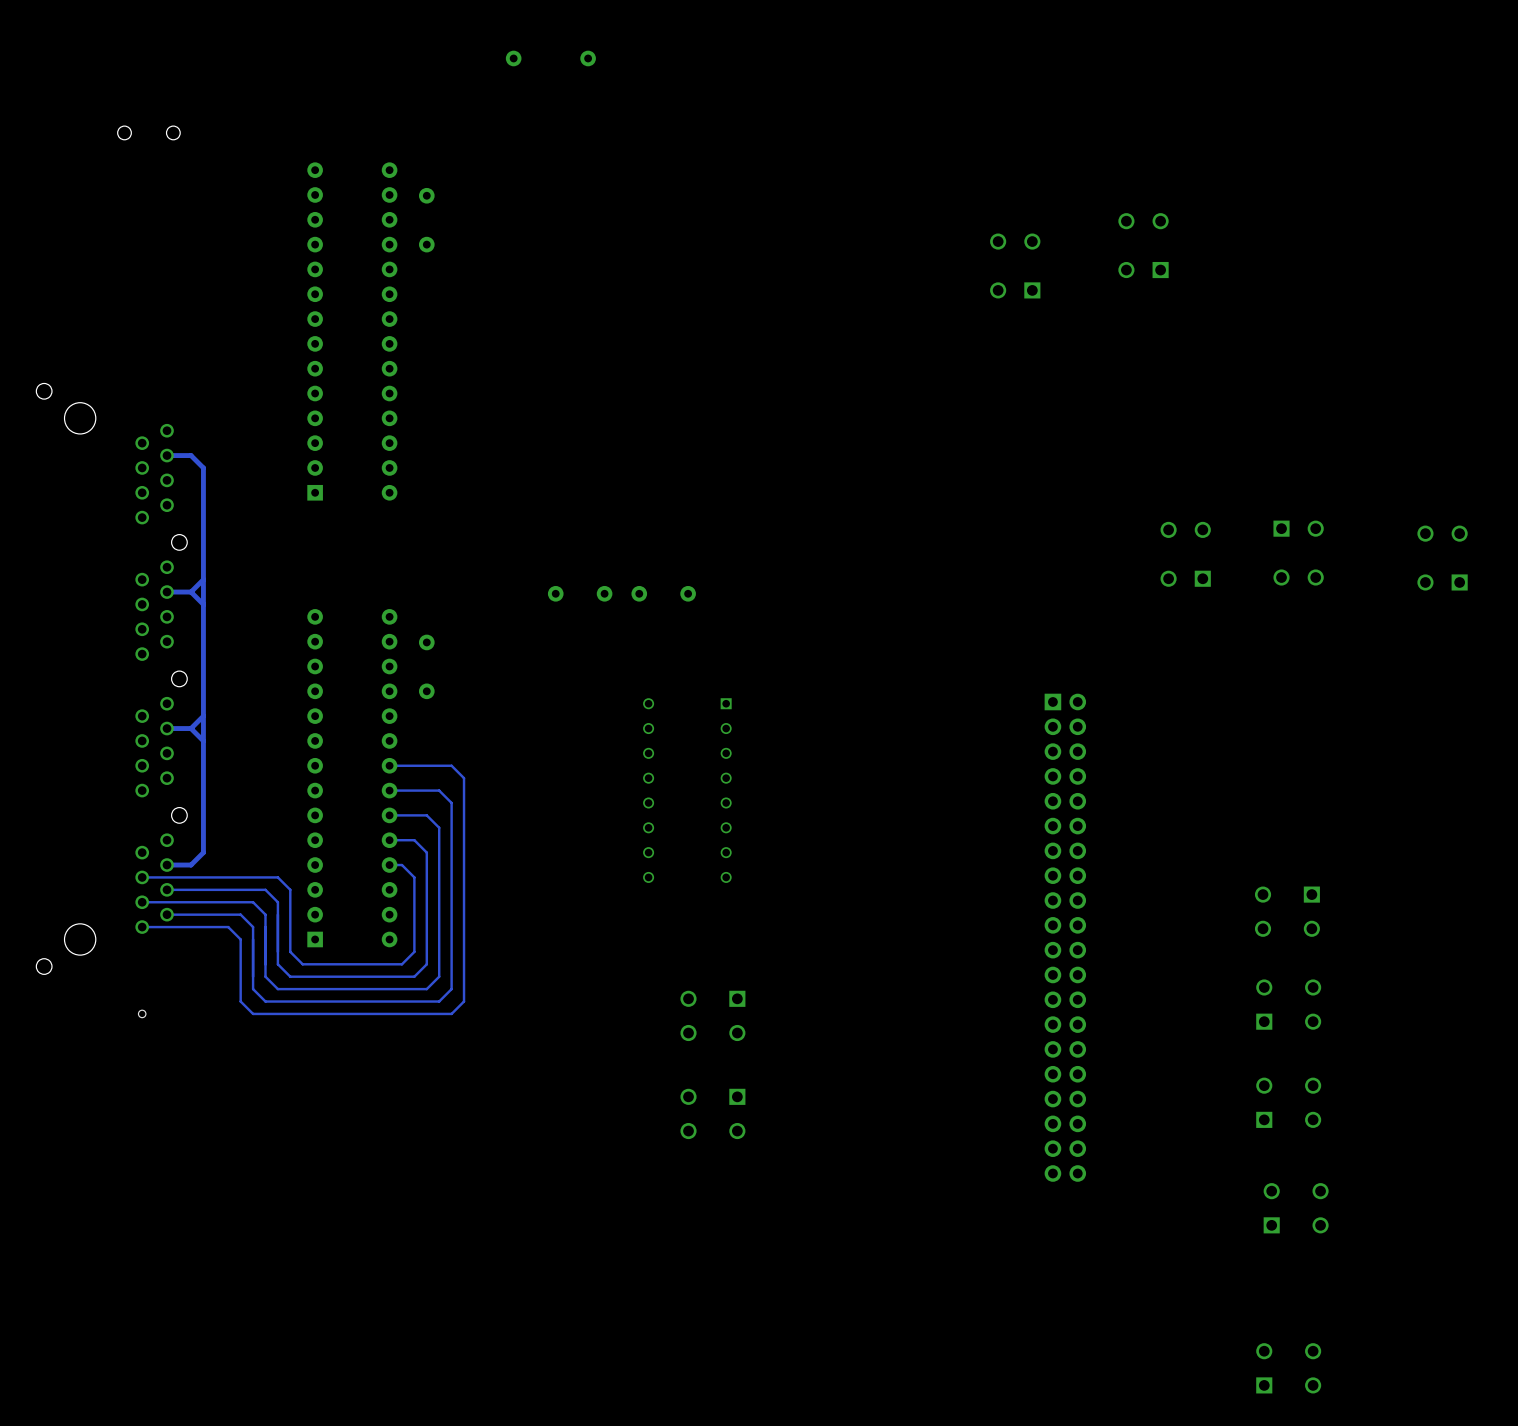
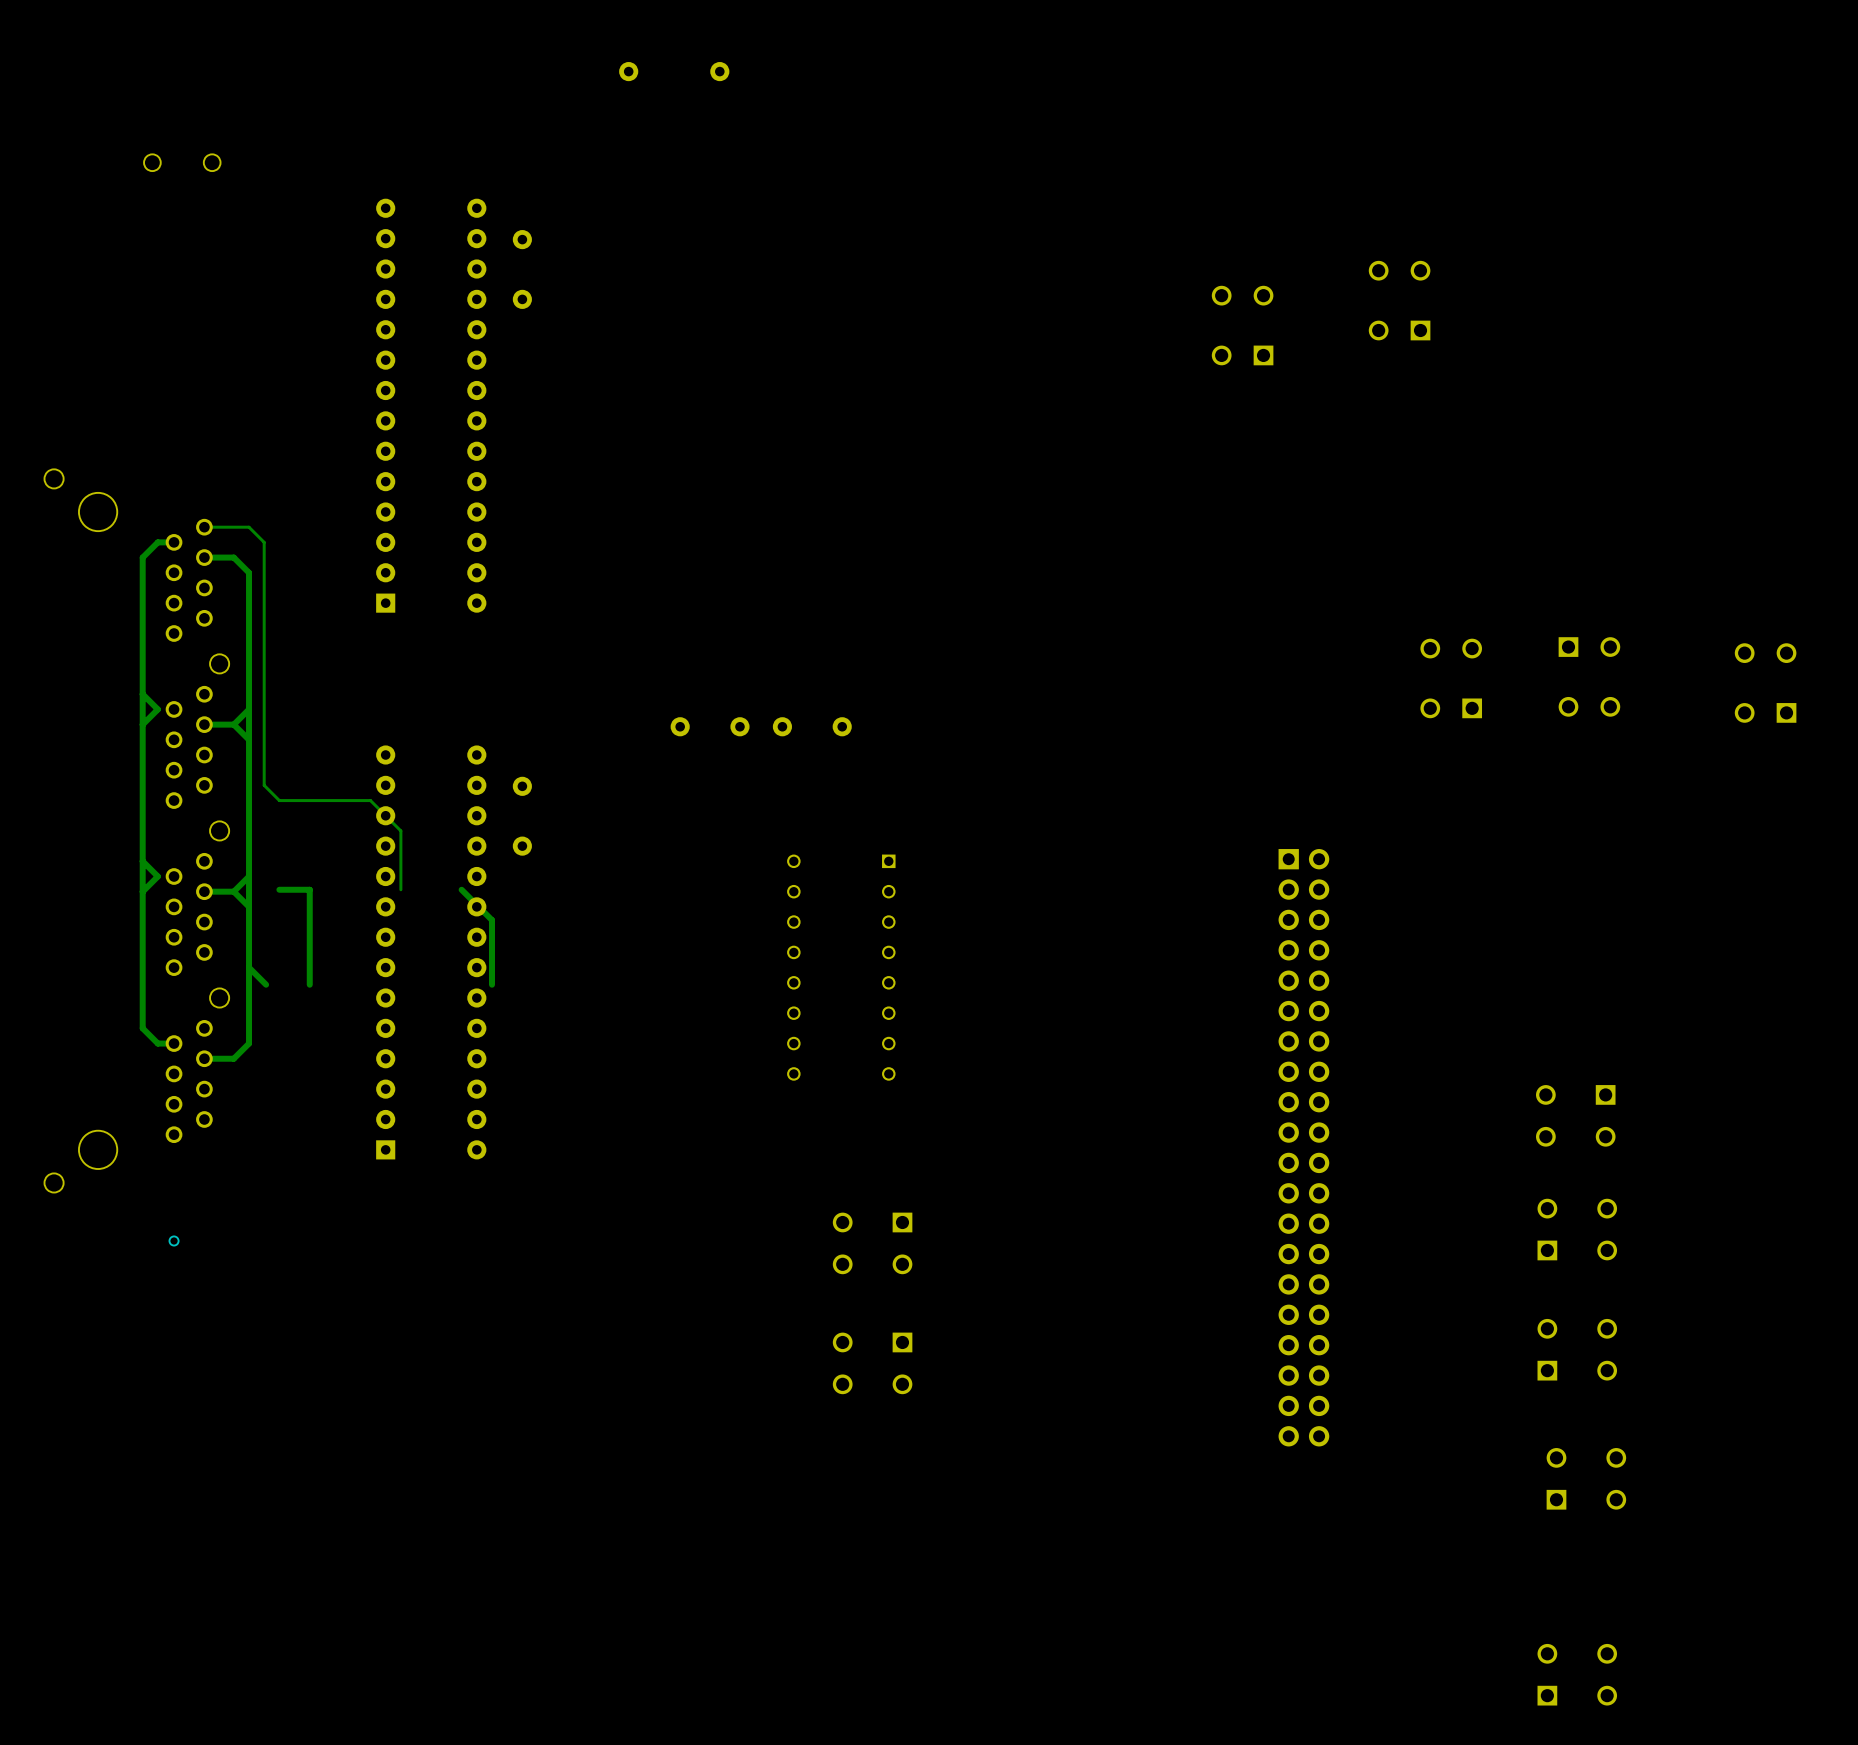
track: none -> (204, 527) (249, 527) (264, 542) (264, 785) (279, 800) (370, 800) (400, 830) (400, 889)
track: none -> (174, 542) (157, 542) (142, 557) (142, 1028) (157, 1043) (174, 1043)
track: none -> (142, 694) (157, 709) (142, 724)
track: none -> (142, 861) (157, 876) (142, 891)
track: none -> (279, 889) (309, 889) (309, 984)
track: none -> (461, 889) (492, 920) (492, 984)
track: (389, 765) (451, 765) (464, 778) (464, 1001) (451, 1013) (253, 1013) (240, 1001) (240, 939) (228, 927) (142, 927) -> none
track: none -> (249, 967) (266, 984)
track: (389, 790) (439, 790) (451, 802) (451, 989) (439, 1001) (265, 1001) (253, 989) (253, 927) (240, 914) (167, 914) -> none
track: (389, 815) (426, 815) (439, 827) (439, 976) (426, 989) (277, 989) (265, 976) (265, 914) (253, 902) (142, 902) -> none
track: (389, 840) (414, 840) (426, 852) (426, 964) (414, 976) (290, 976) (277, 964) (277, 902) (265, 889) (167, 889) -> none
track: (389, 865) (401, 865) (414, 877) (414, 951) (401, 964) (302, 964) (290, 951) (290, 889) (277, 877) (142, 877) -> none

